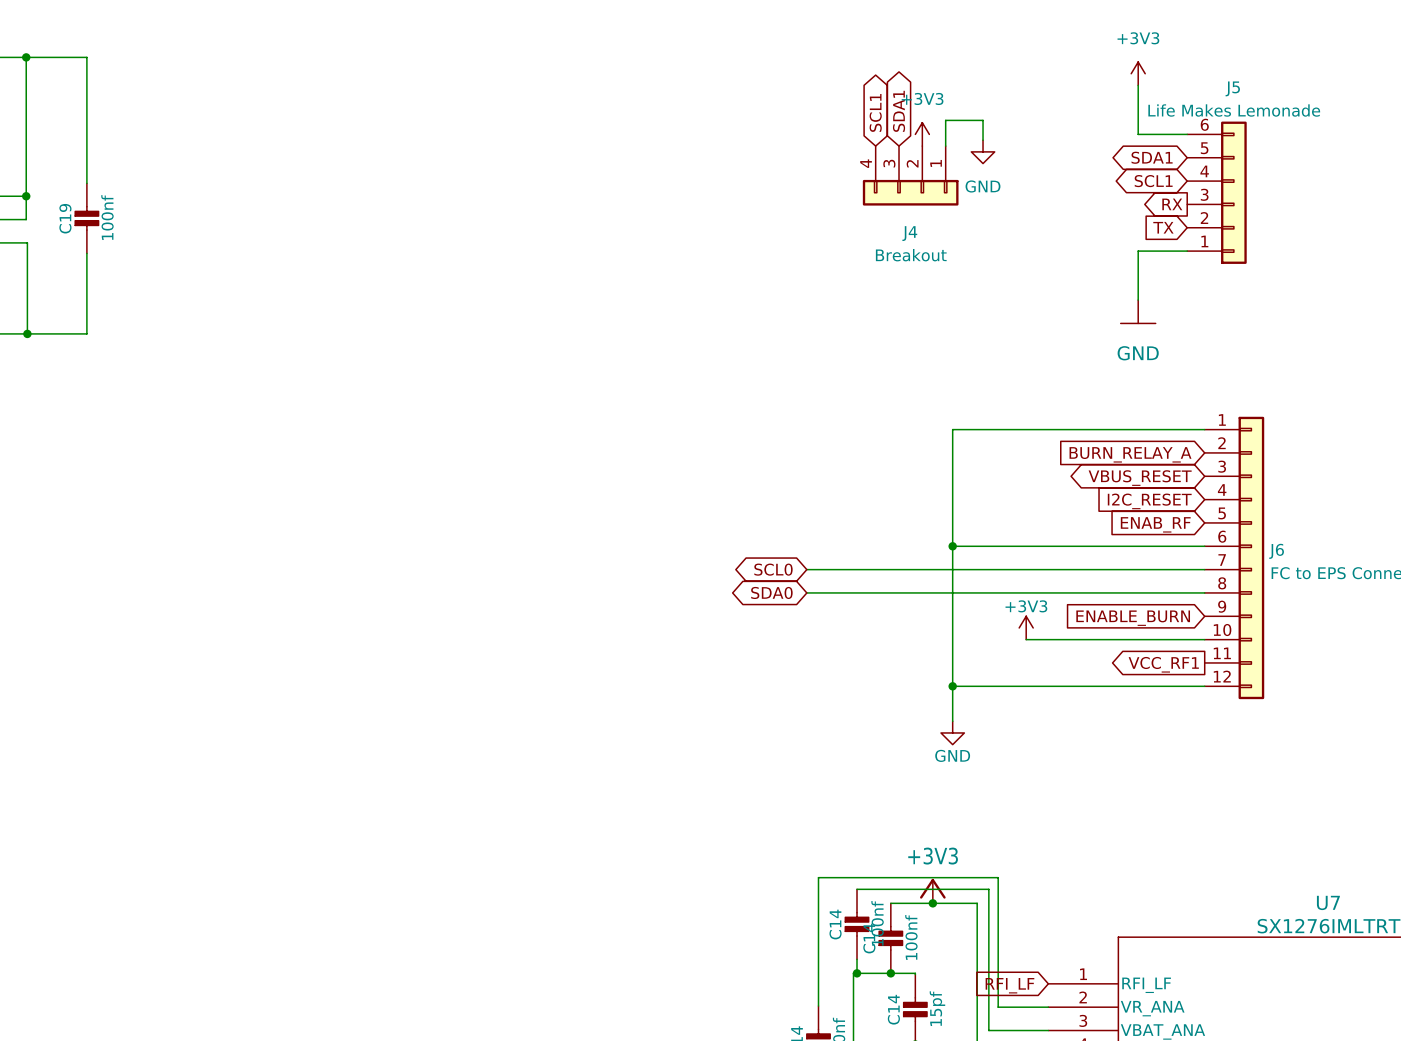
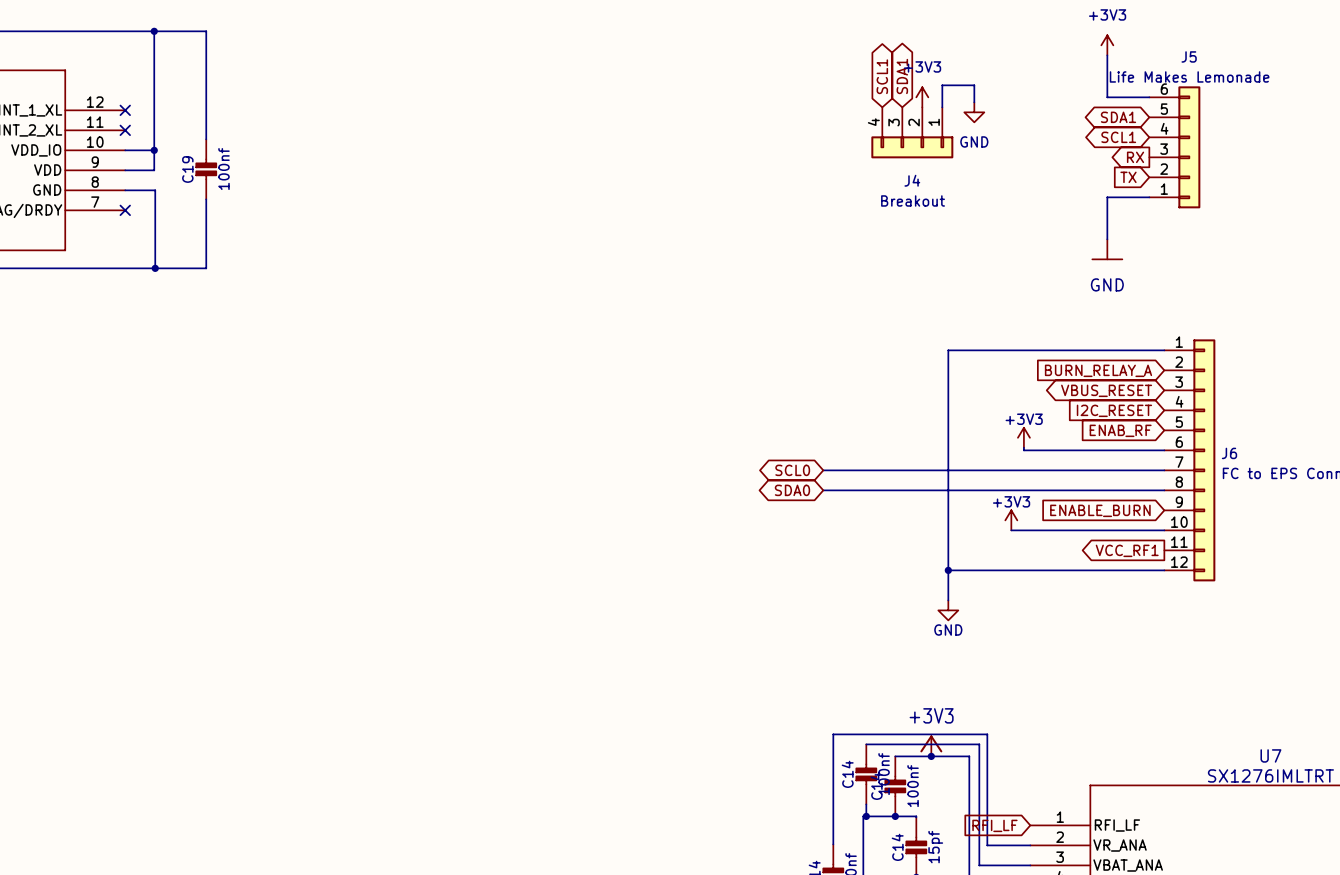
power symbol: none -> +3V3 (1023, 437)
wire: (952, 546) (1040, 546) -> (1023, 447) (1023, 450)
junction: (952, 546) -> none

